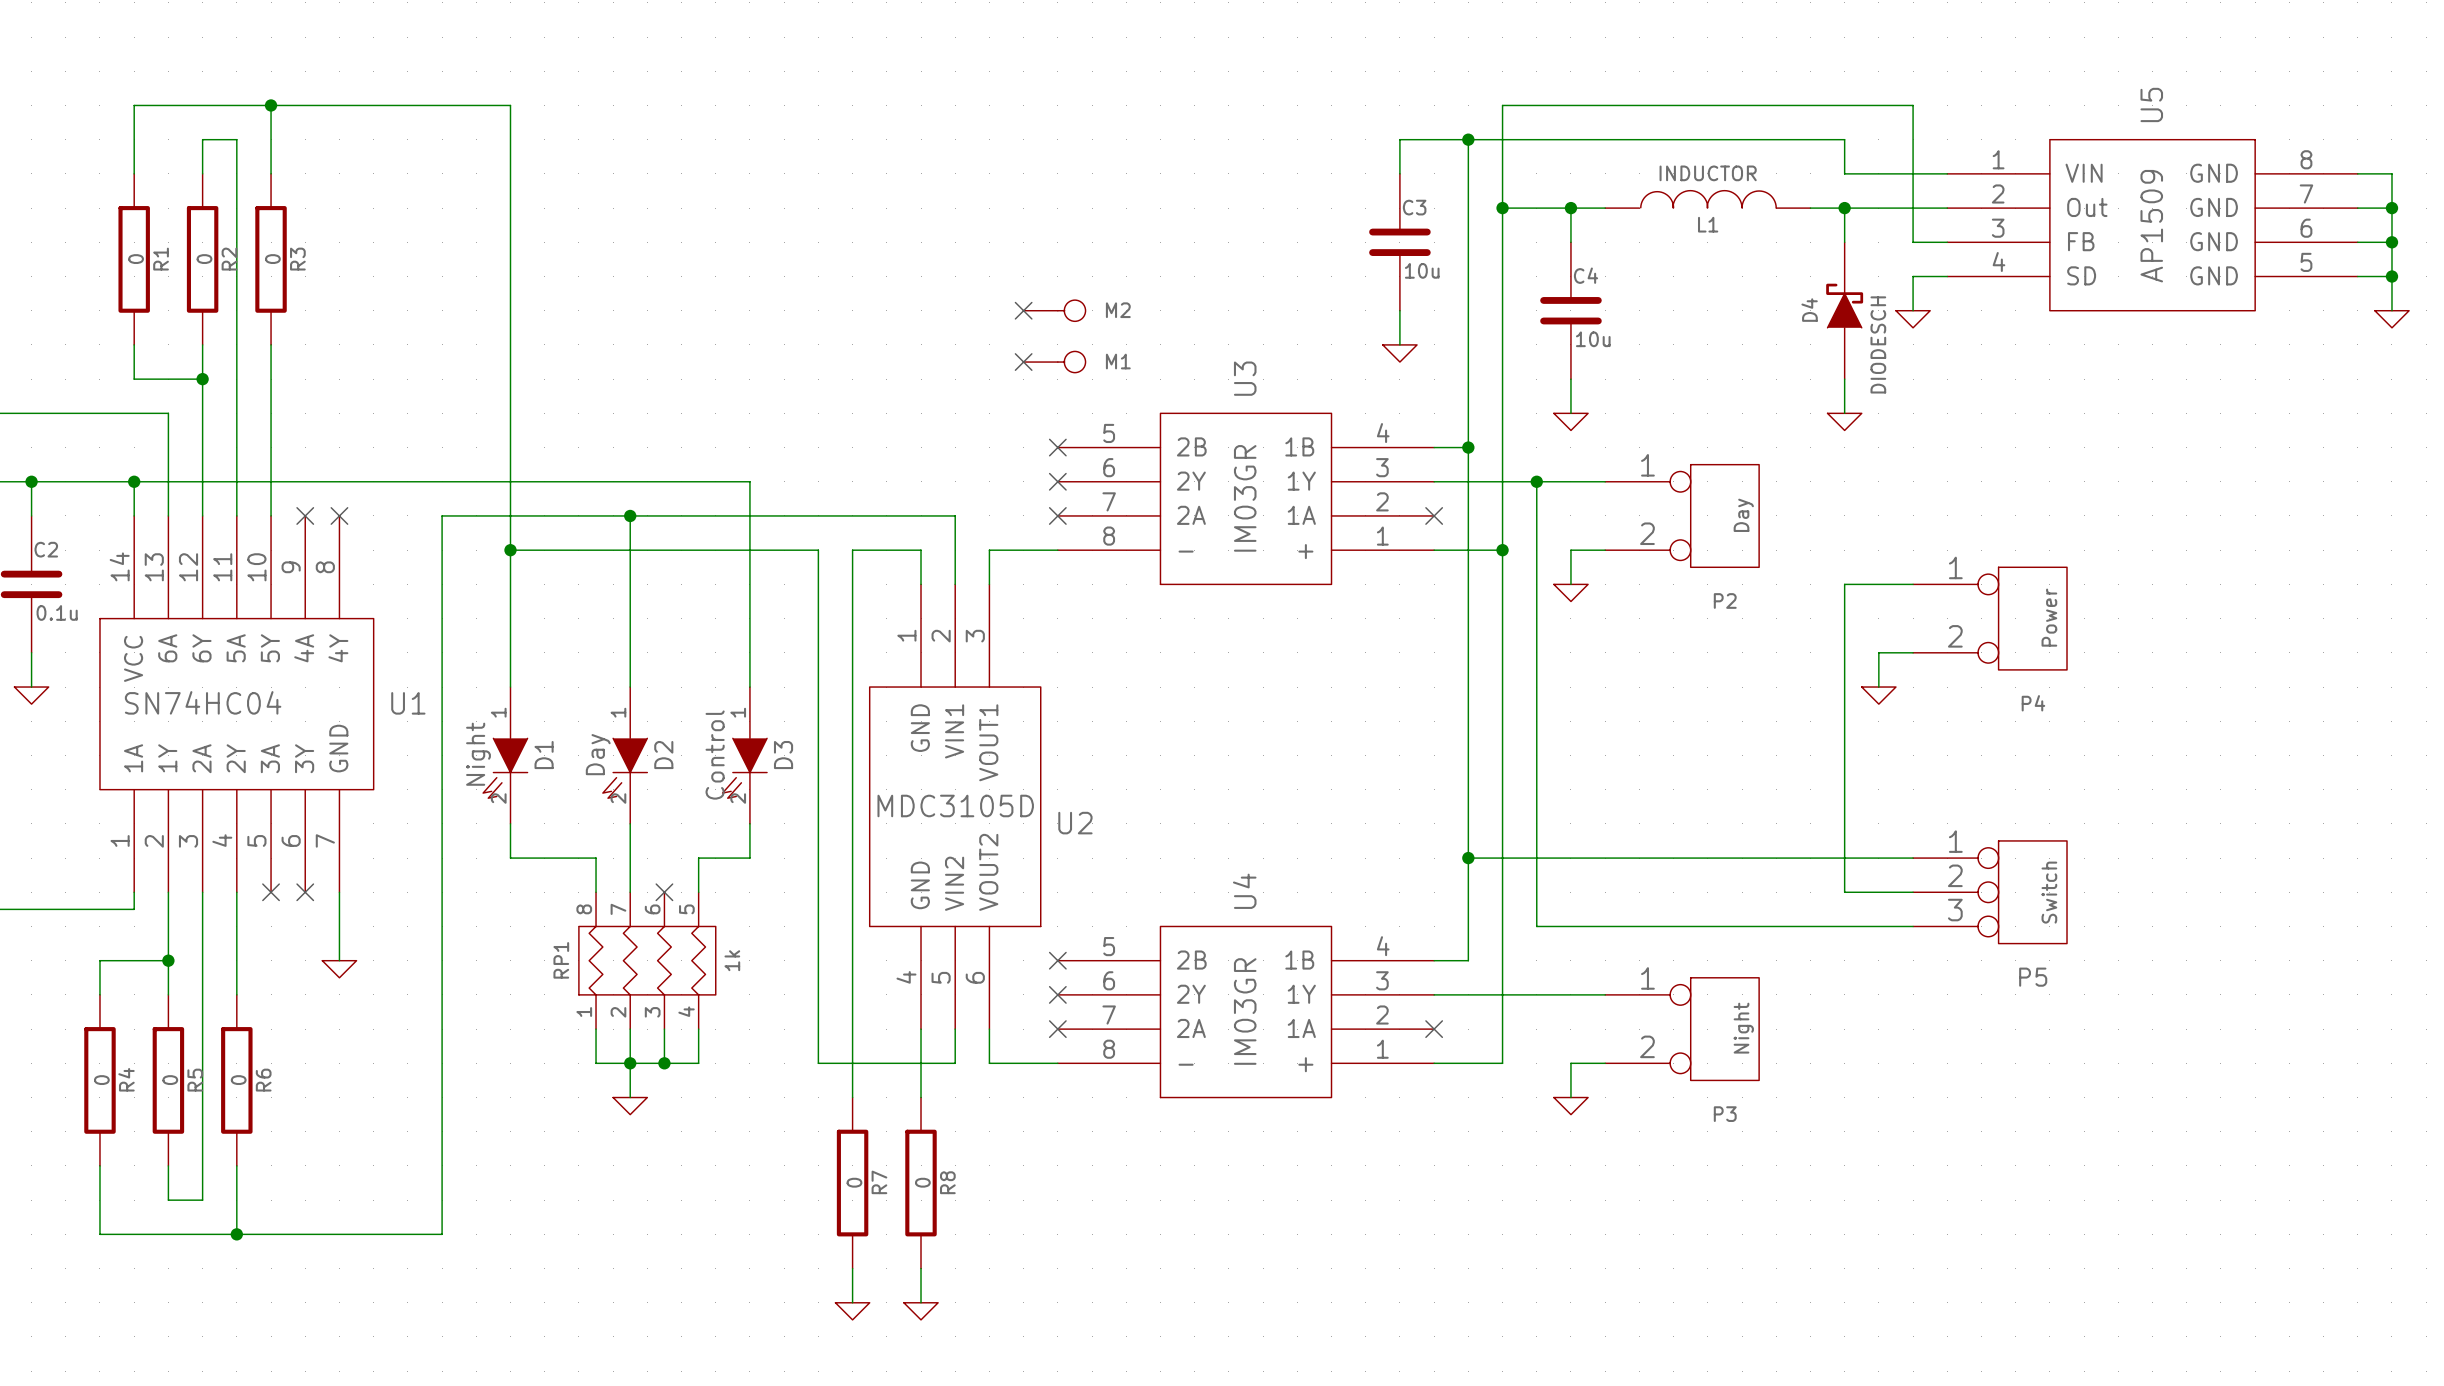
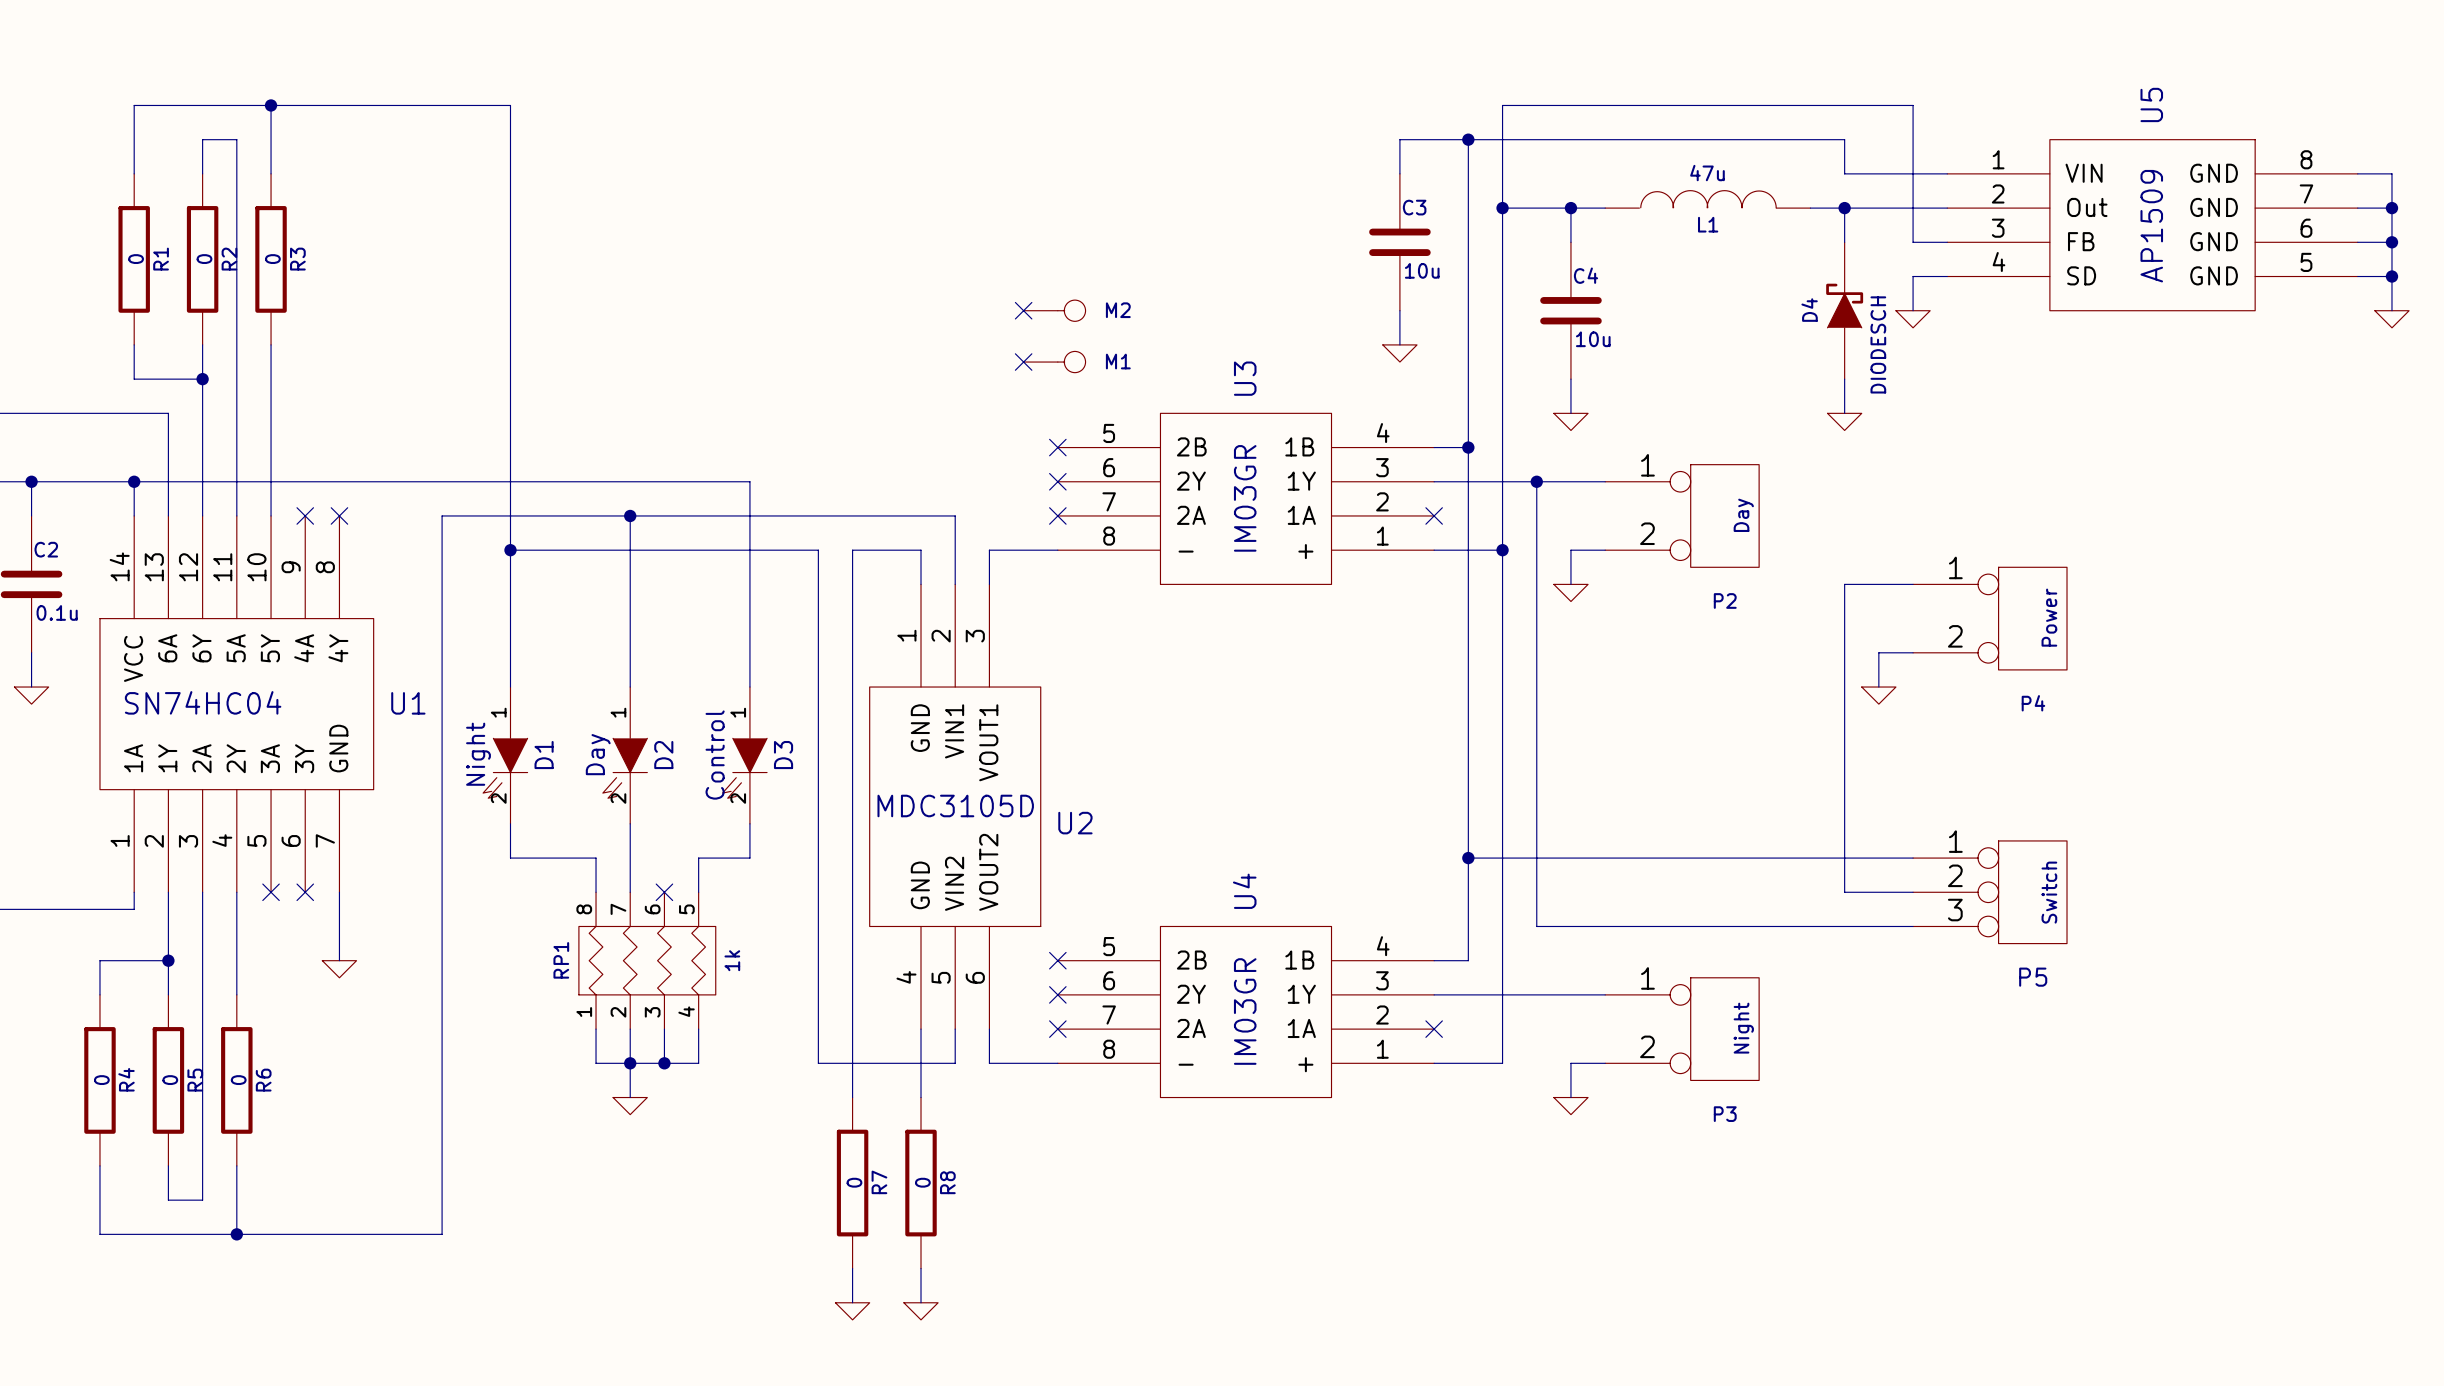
L1 value: INDUCTOR (1708, 173) -> 47u (1707, 173)

